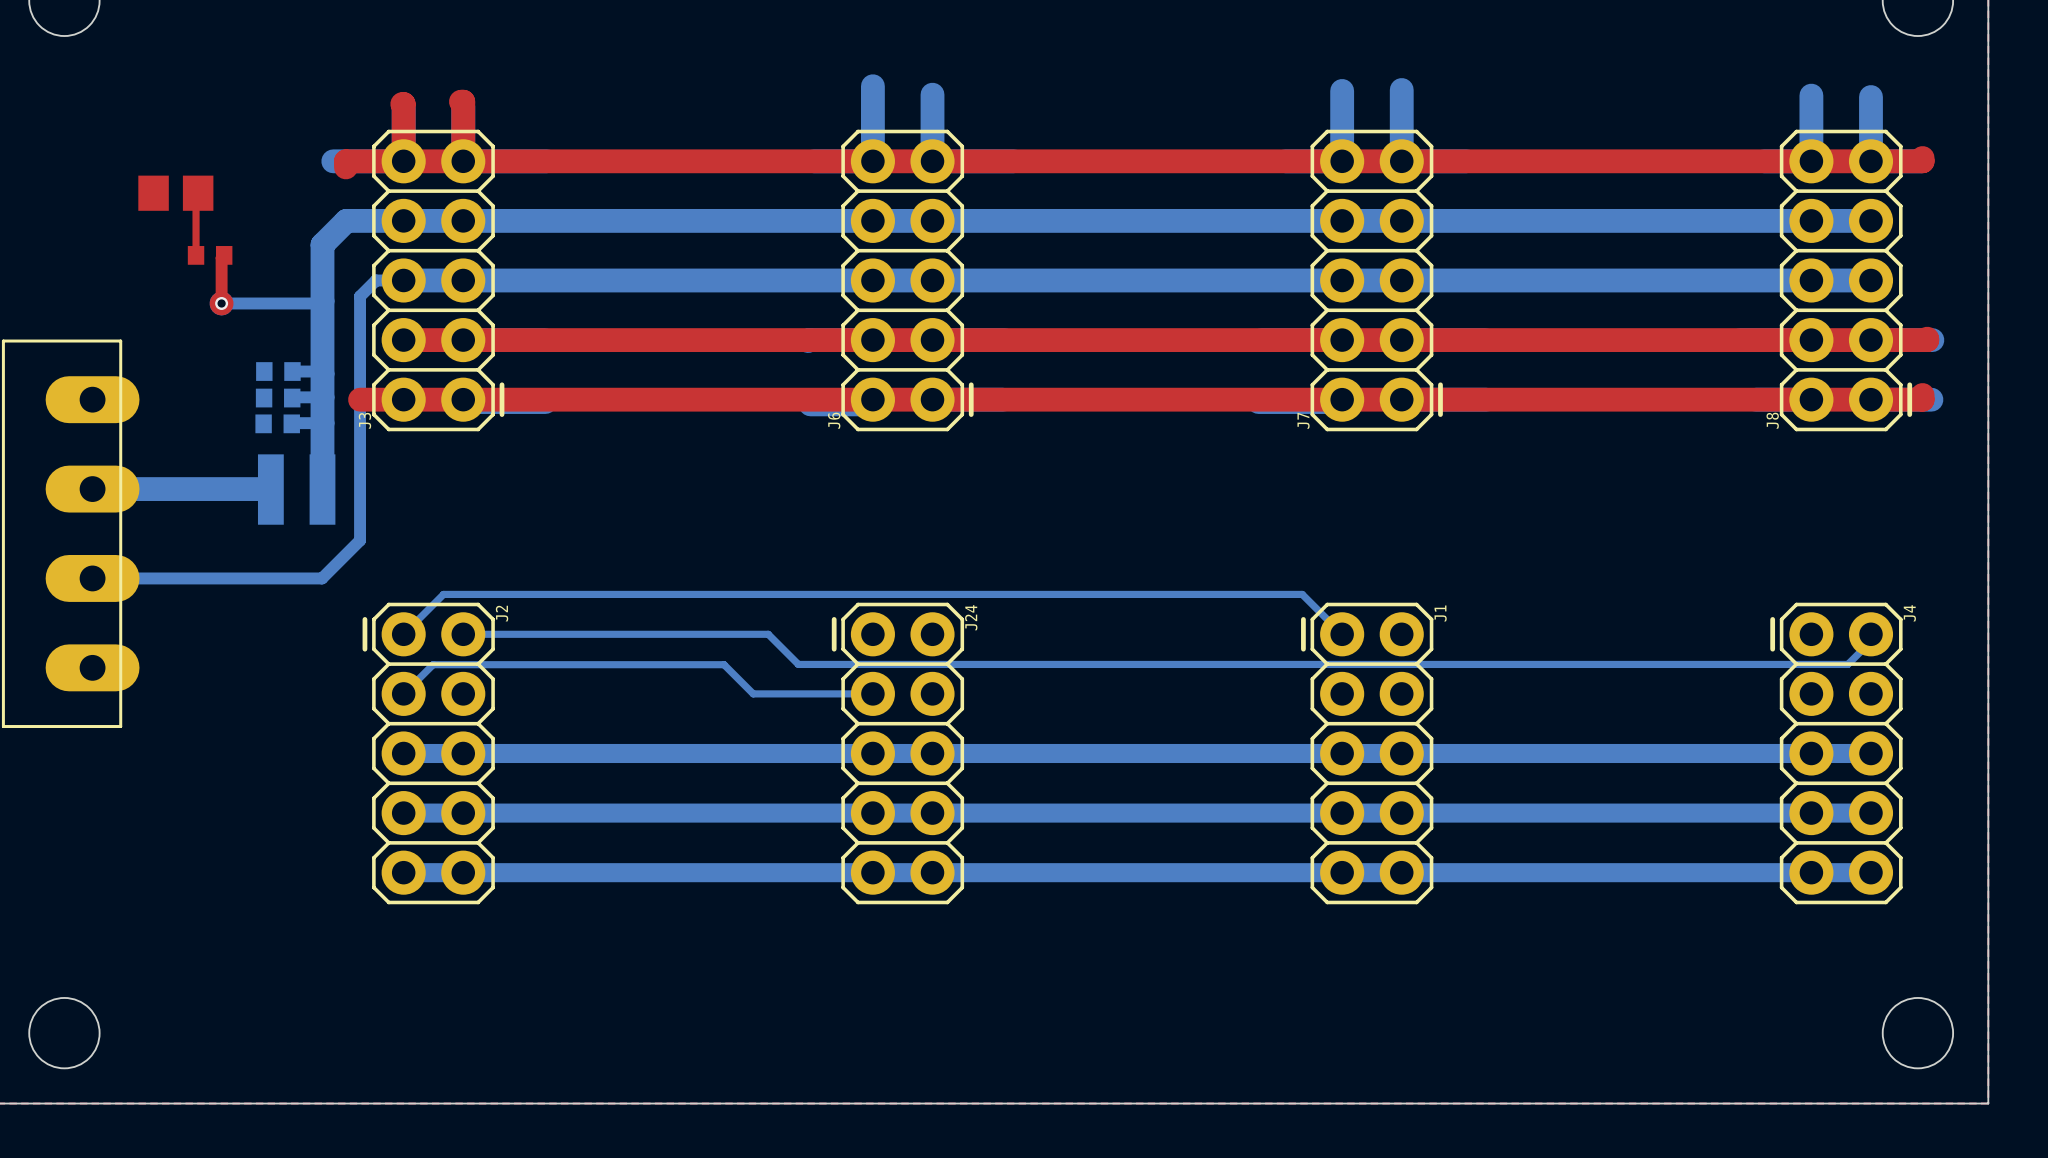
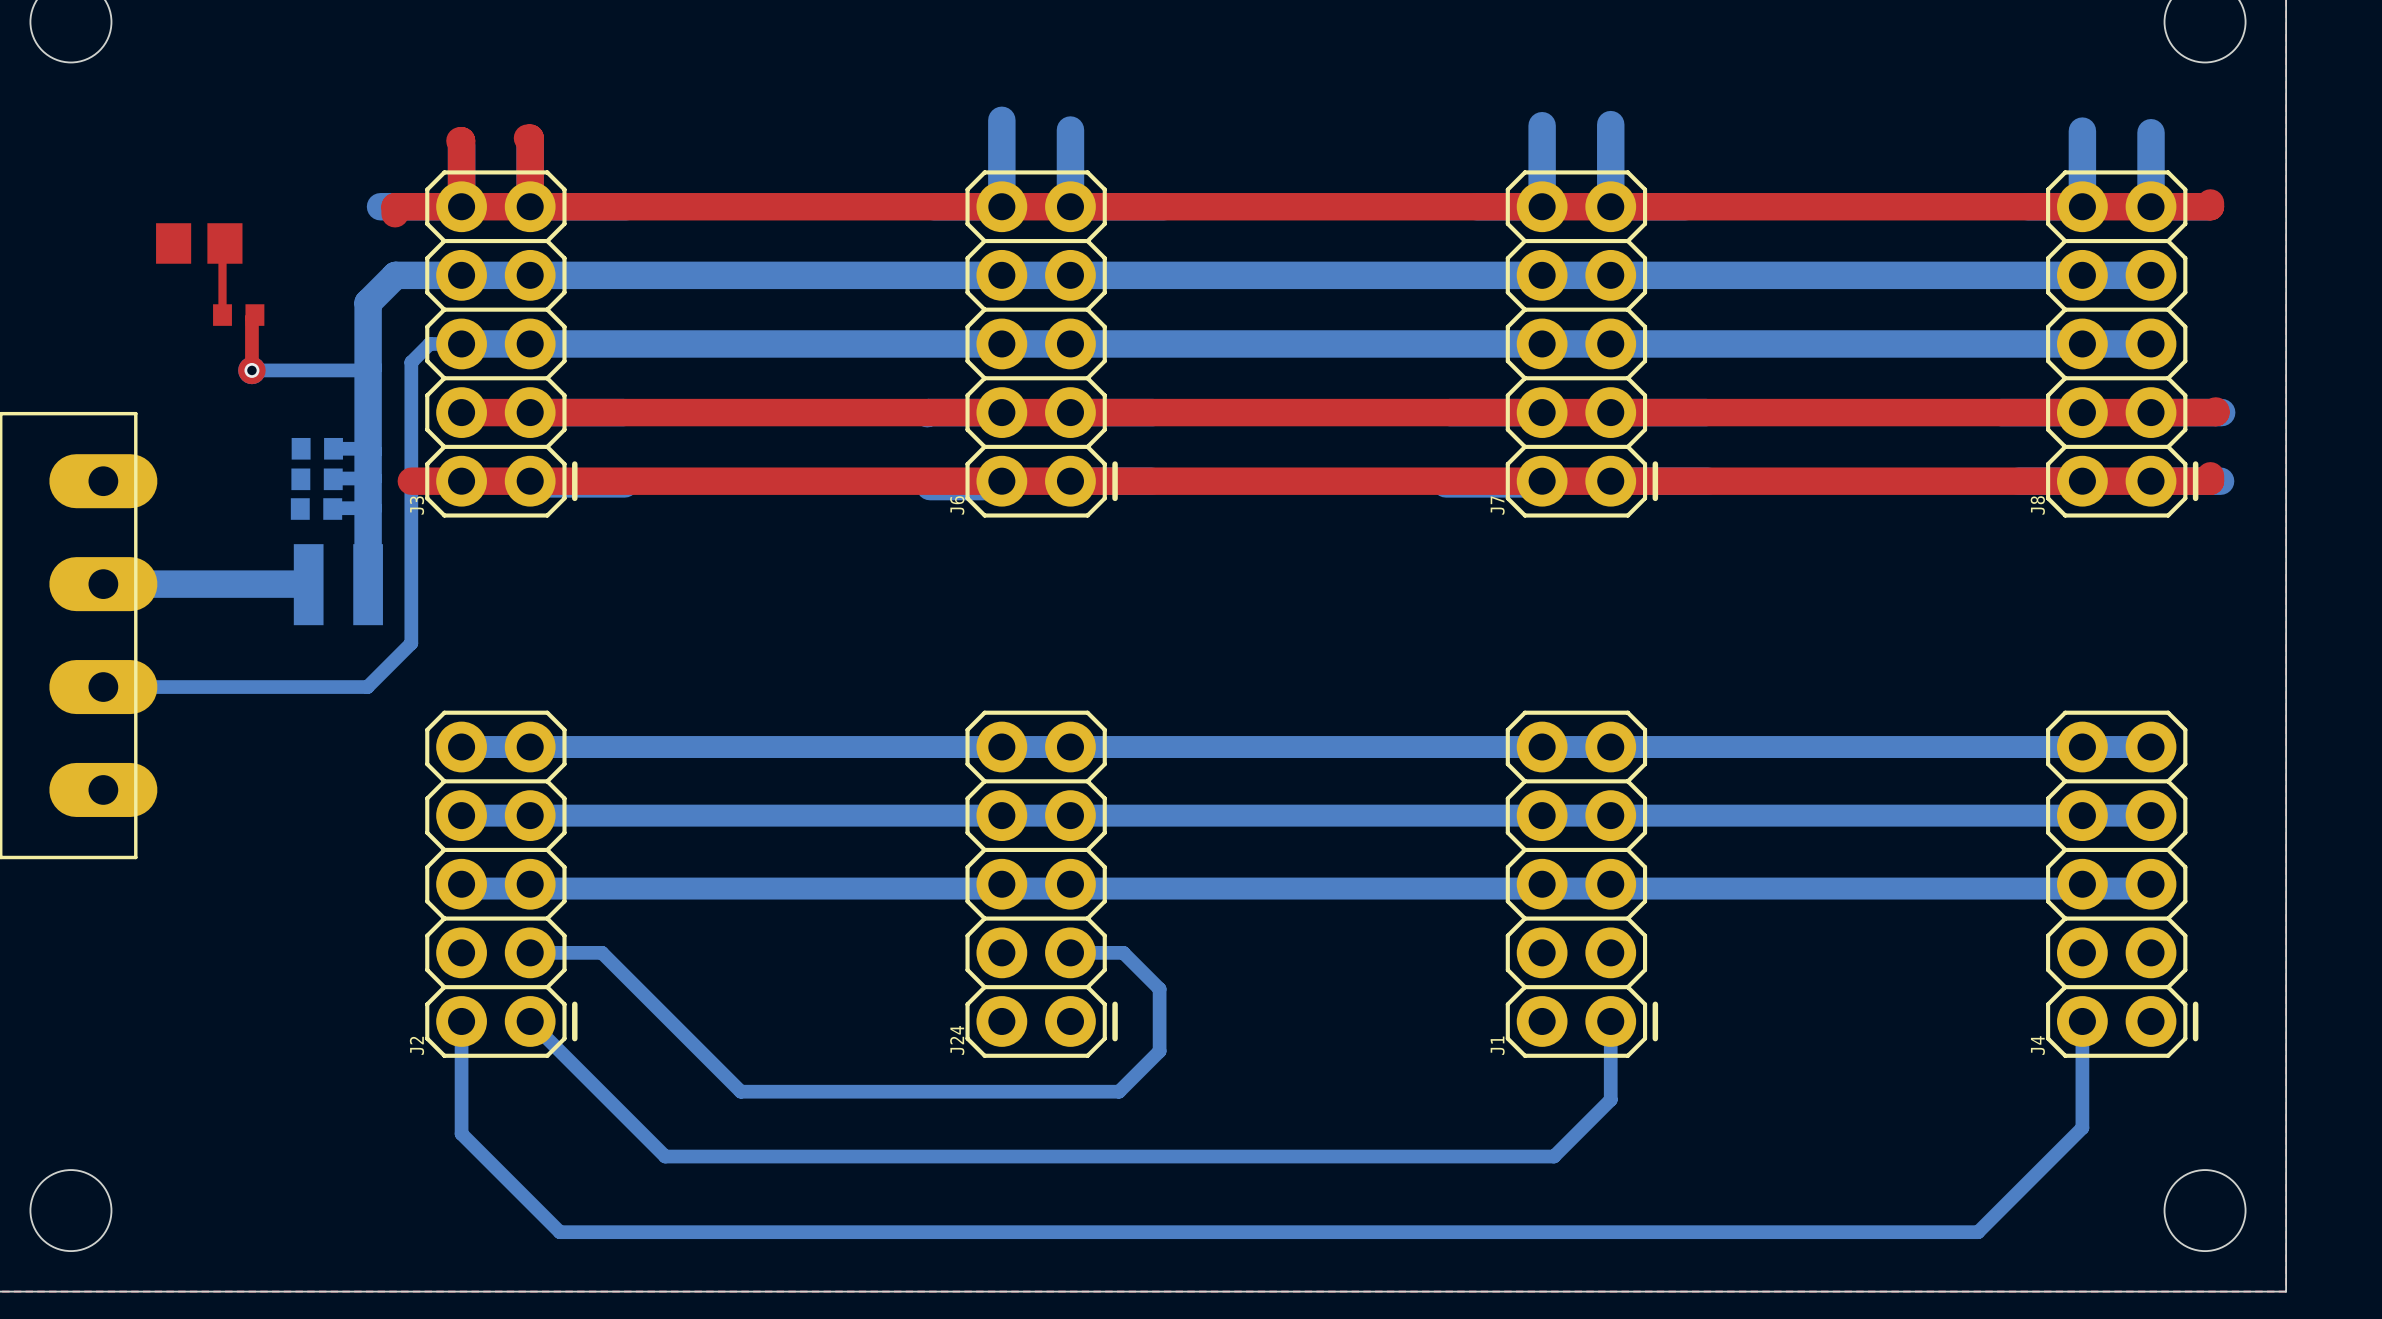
bottom track: (403, 634) (443, 594) (1302, 594) (1342, 634) -> none
bottom track: (463, 634) (768, 634) (798, 664) (1847, 664) (1870, 641) (1870, 634) -> none
bottom track: (403, 693) (433, 664) (724, 664) (753, 693) (872, 693) -> none
J2 rotation: 0° (428, 753) -> 180° (501, 884)
J24 rotation: 0° (897, 753) -> 180° (1041, 884)
J1 rotation: 0° (1367, 753) -> 180° (1581, 884)
J4 rotation: 0° (1836, 753) -> 180° (2122, 884)
bottom track: none -> (530, 952) (602, 952) (740, 1091) (1119, 1091) (1159, 1051) (1159, 989) (1123, 952) (1070, 952)
bottom track: (403, 813) (1870, 813) -> (461, 815) (2151, 815)
bottom track: none -> (461, 1021) (461, 1133) (559, 1232) (1978, 1232) (2082, 1127) (2082, 1021)
bottom track: none -> (530, 1021) (665, 1156) (1554, 1156) (1610, 1099) (1610, 1021)
bottom track: (403, 872) (1870, 872) -> (461, 747) (2151, 747)

